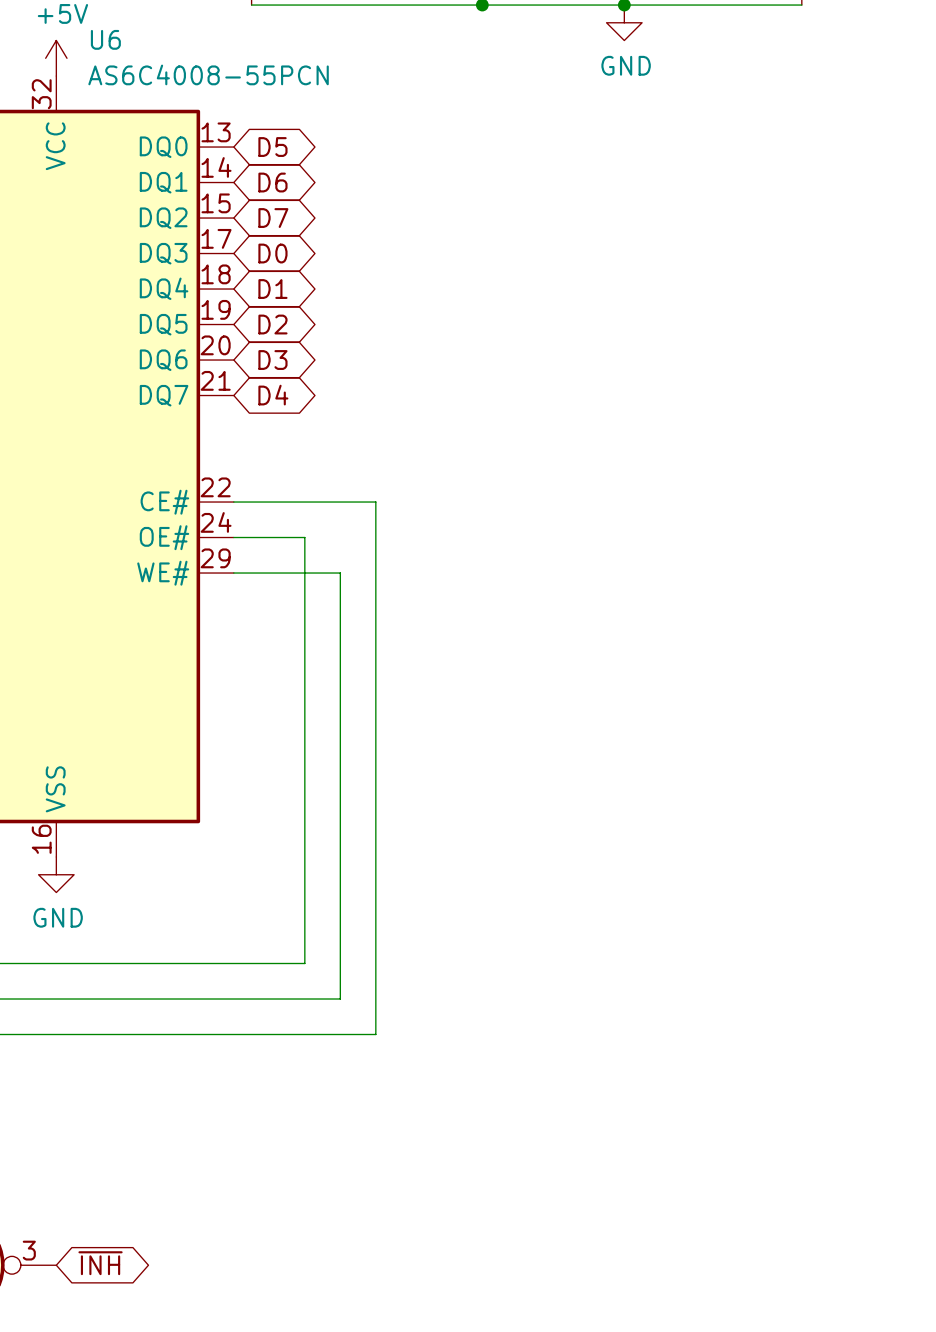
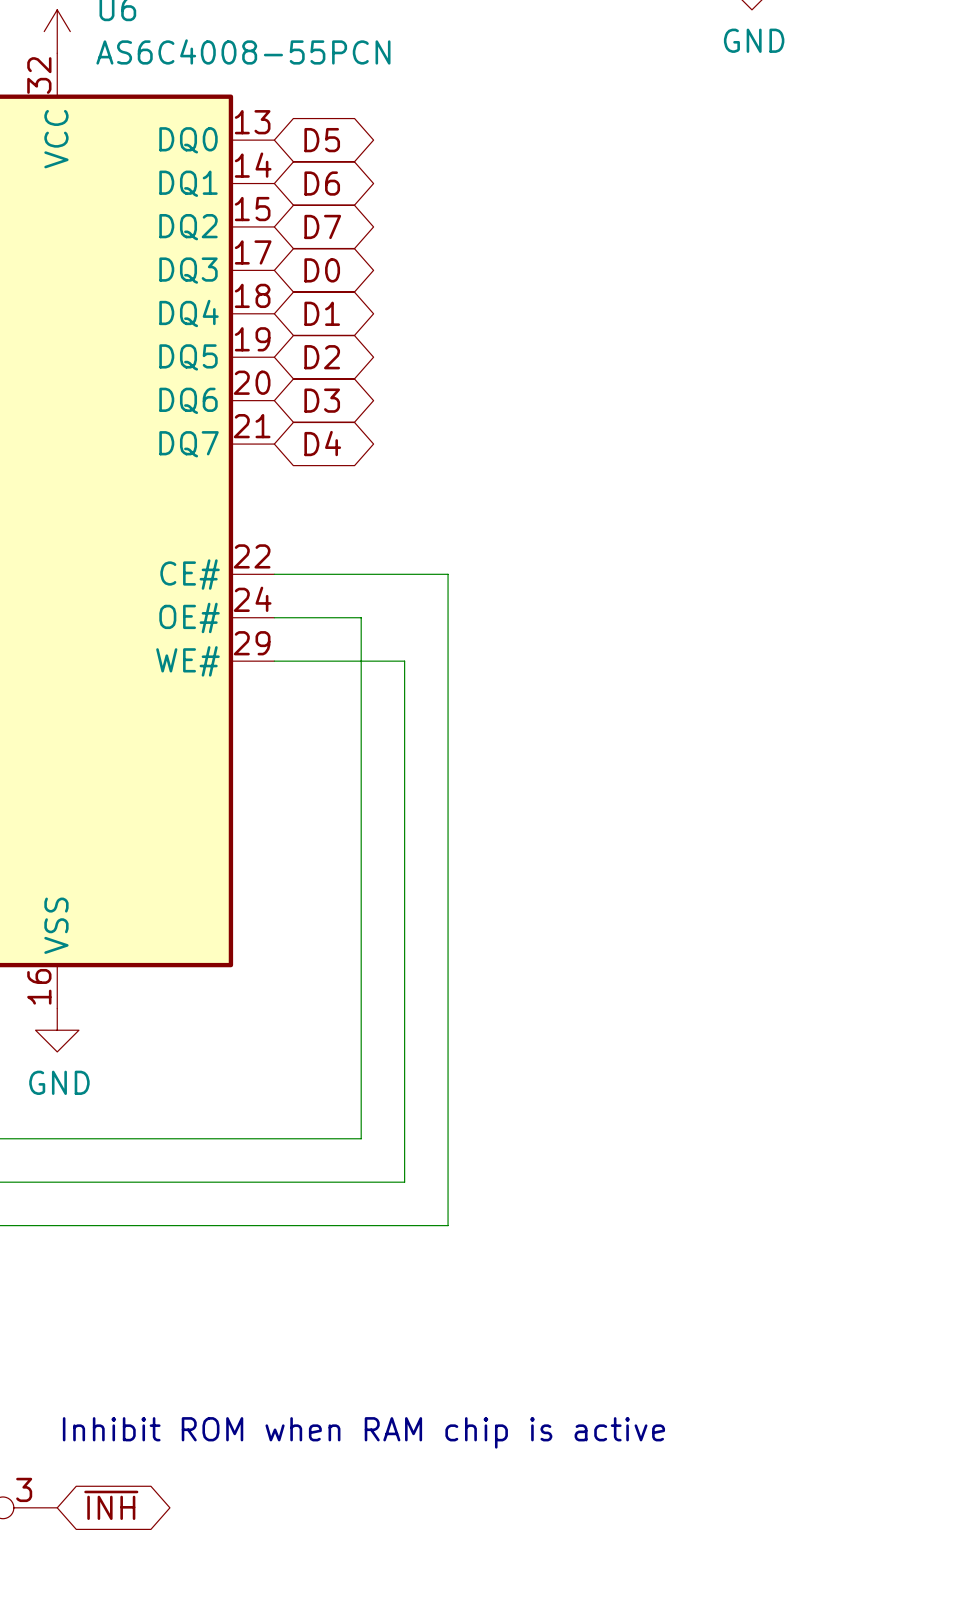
text: none -> Inhibit ROM when RAM chip is active (363, 1432)

